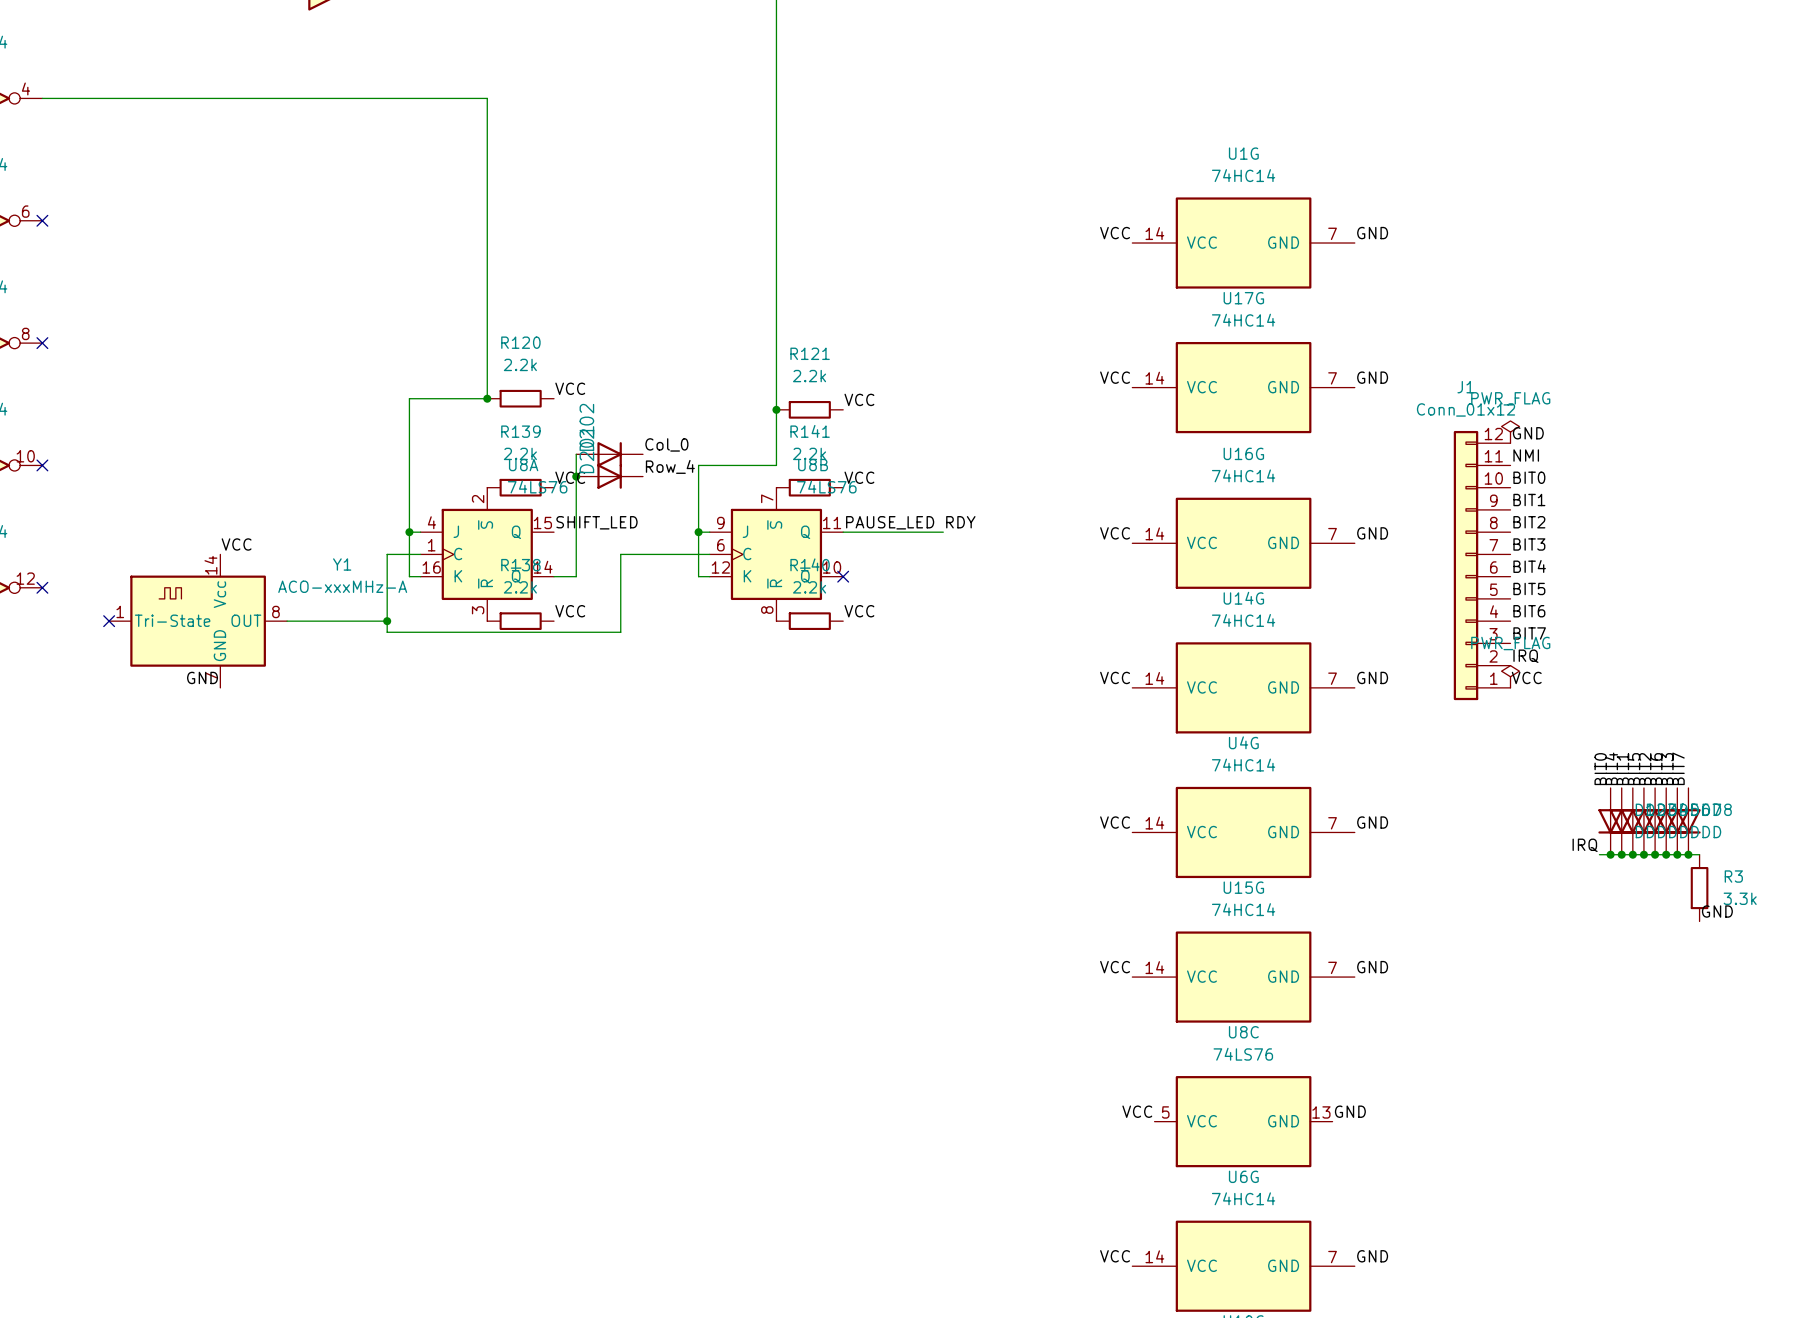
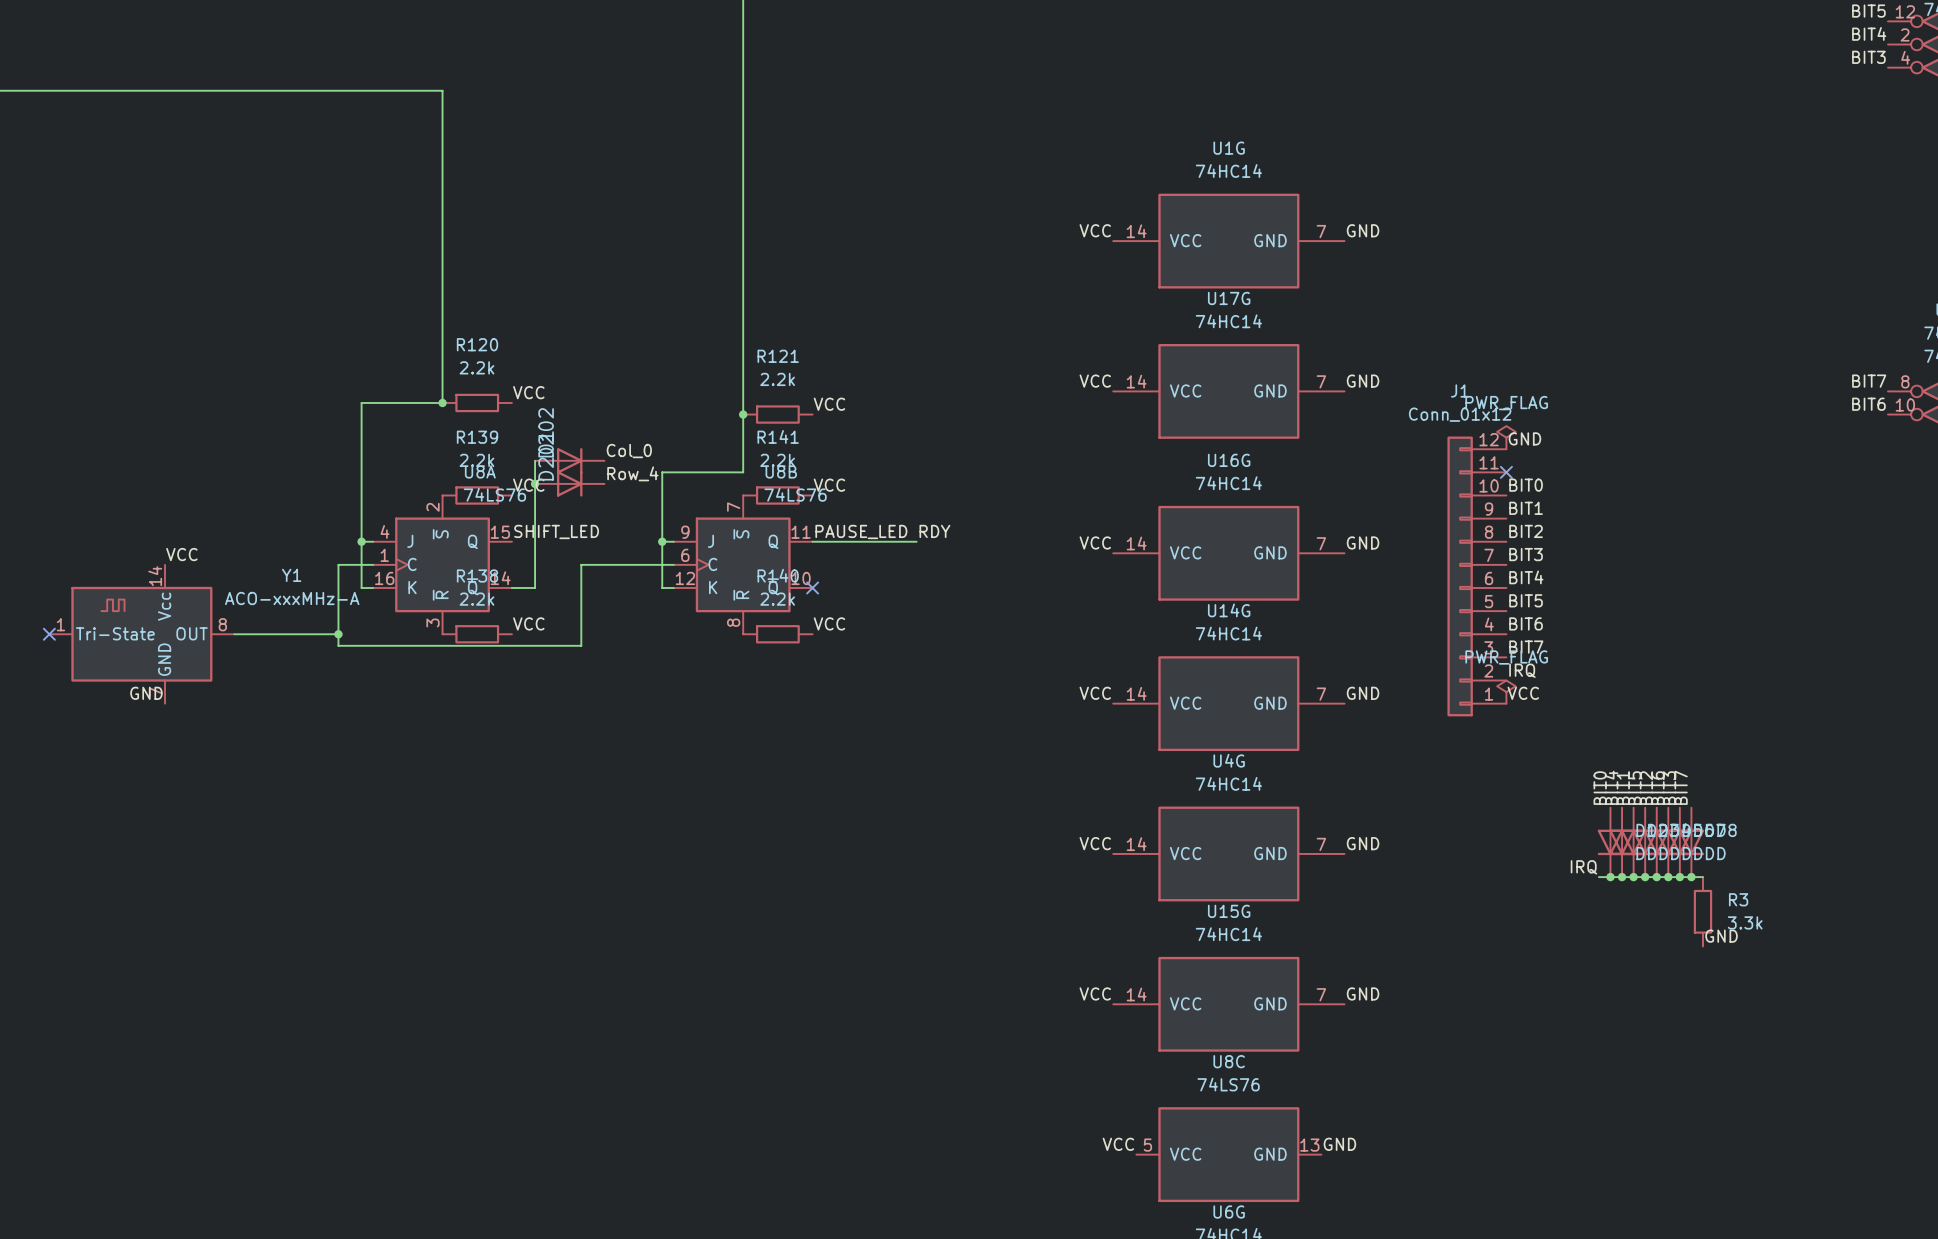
label: NMI (1526, 455) -> none
no-connect mark: none -> (1506, 472)

